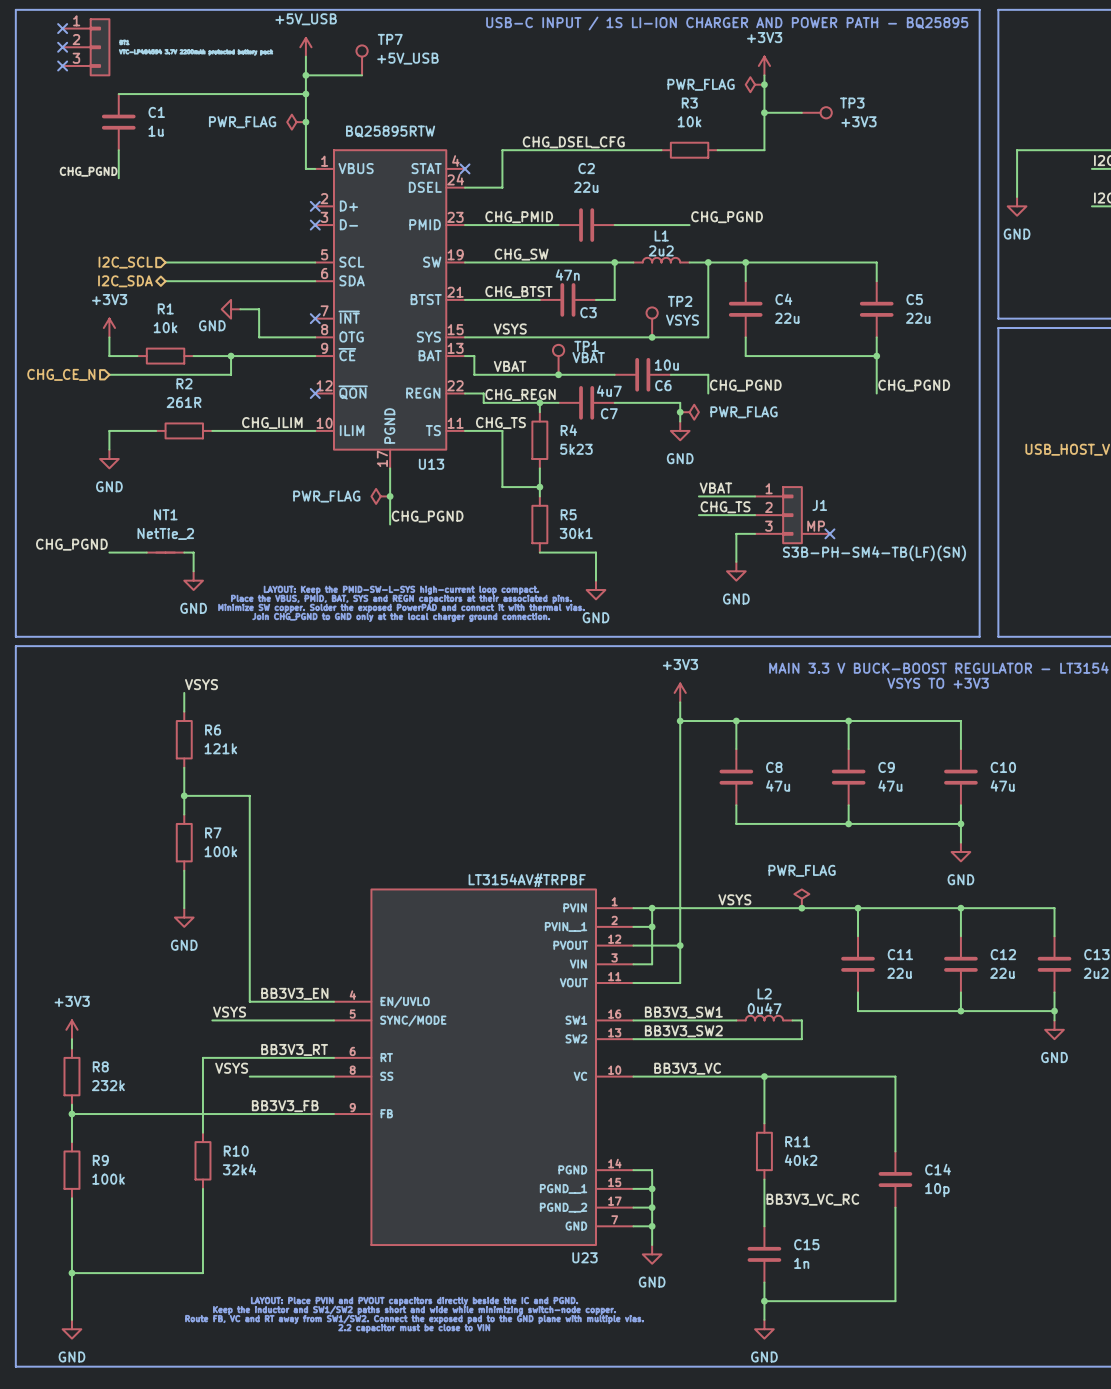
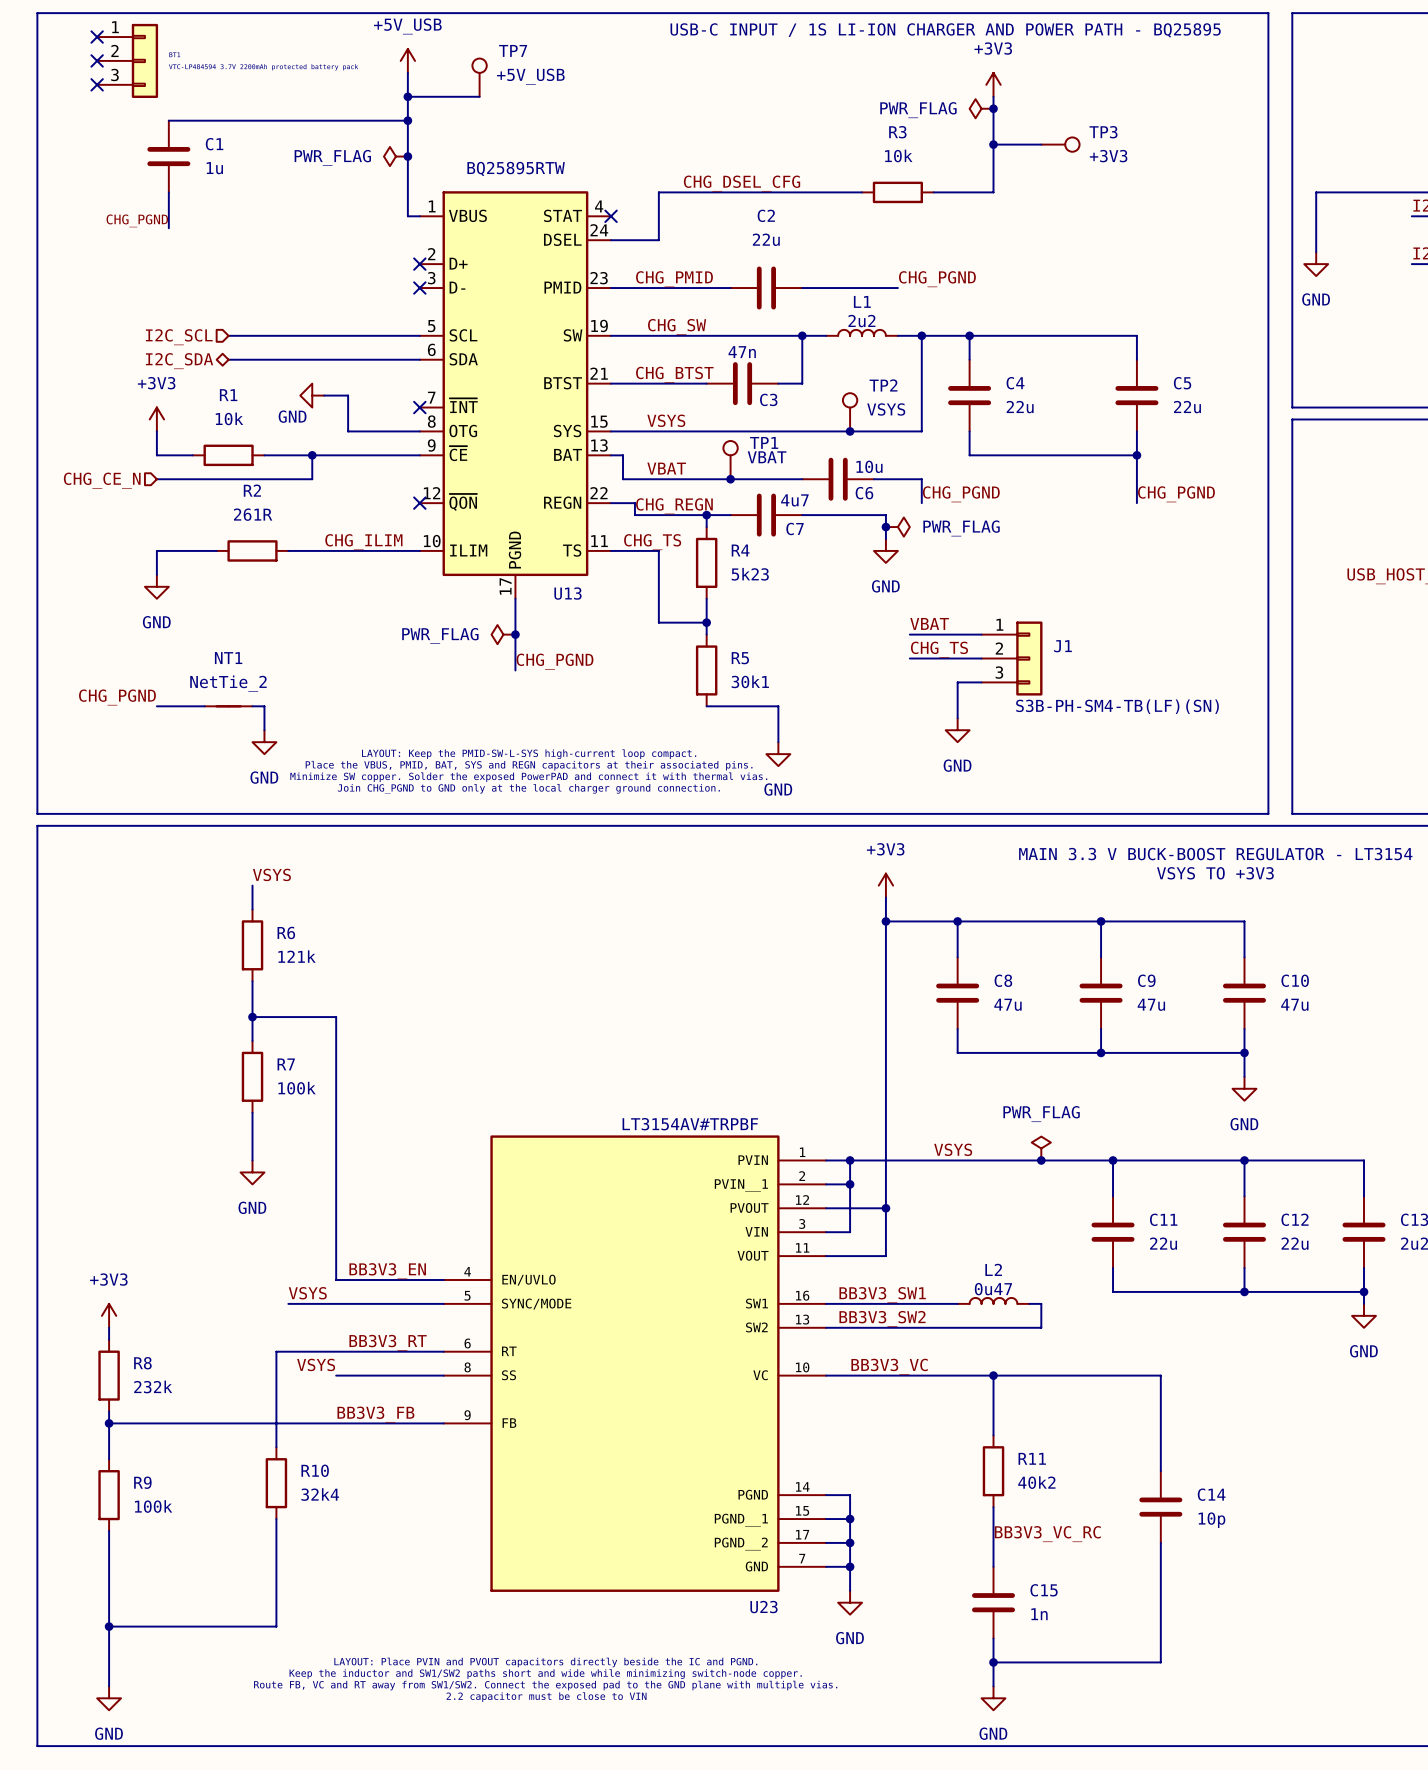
J1 symbol: [755, 486, 830, 545] -> [981, 621, 1043, 696]
no-connect mark: (829, 533) -> none

